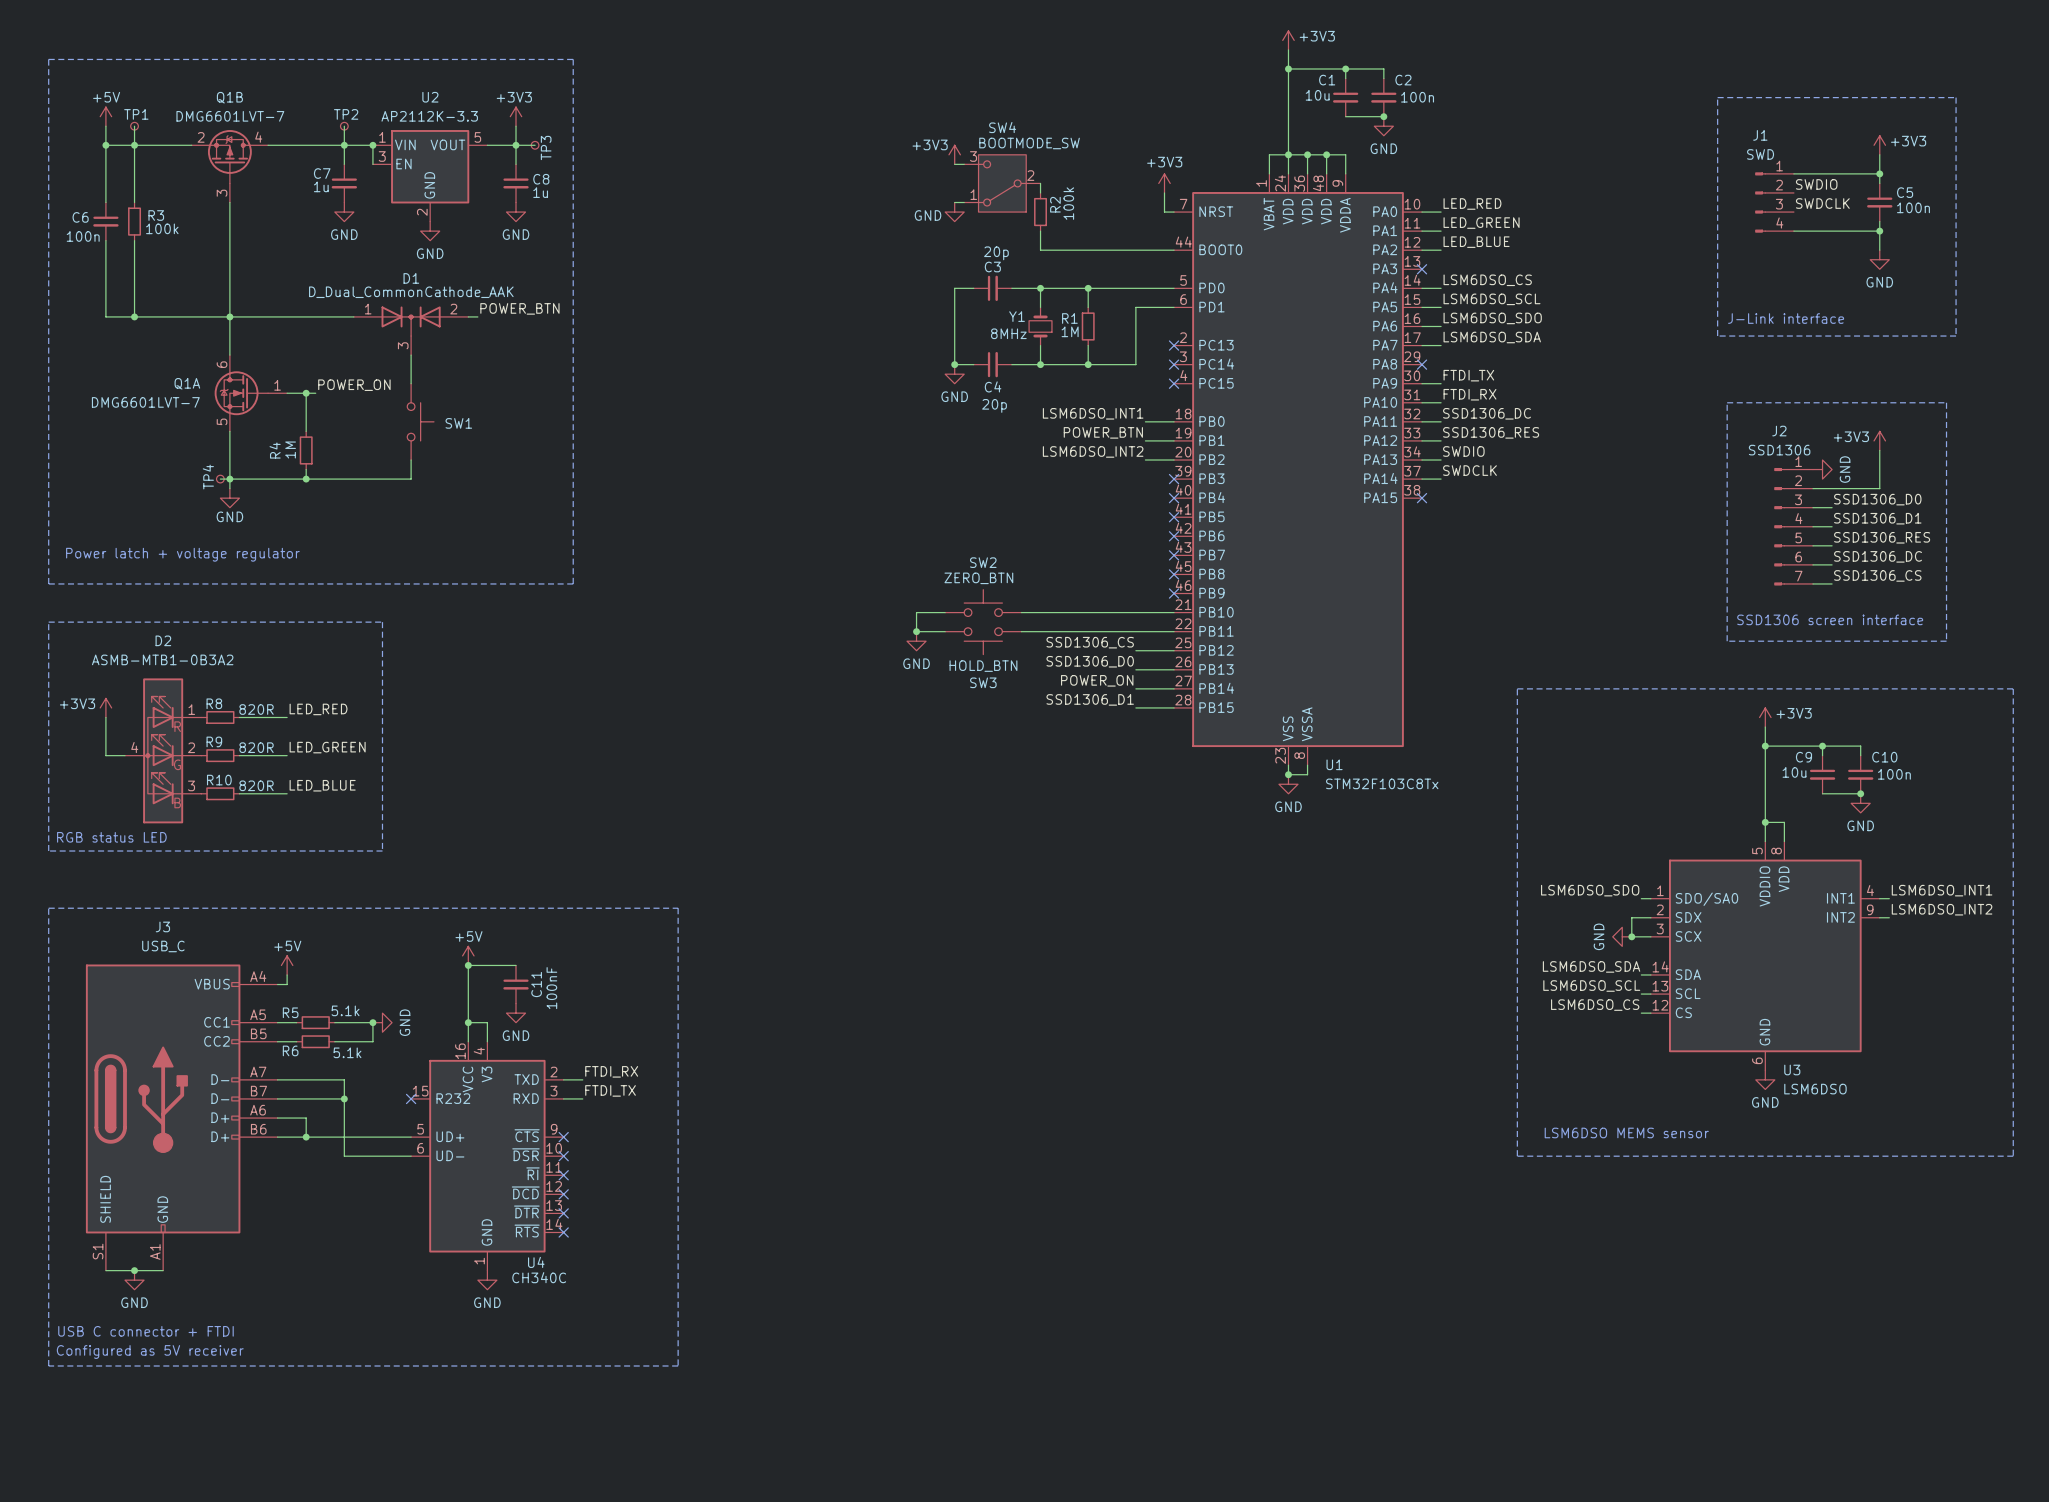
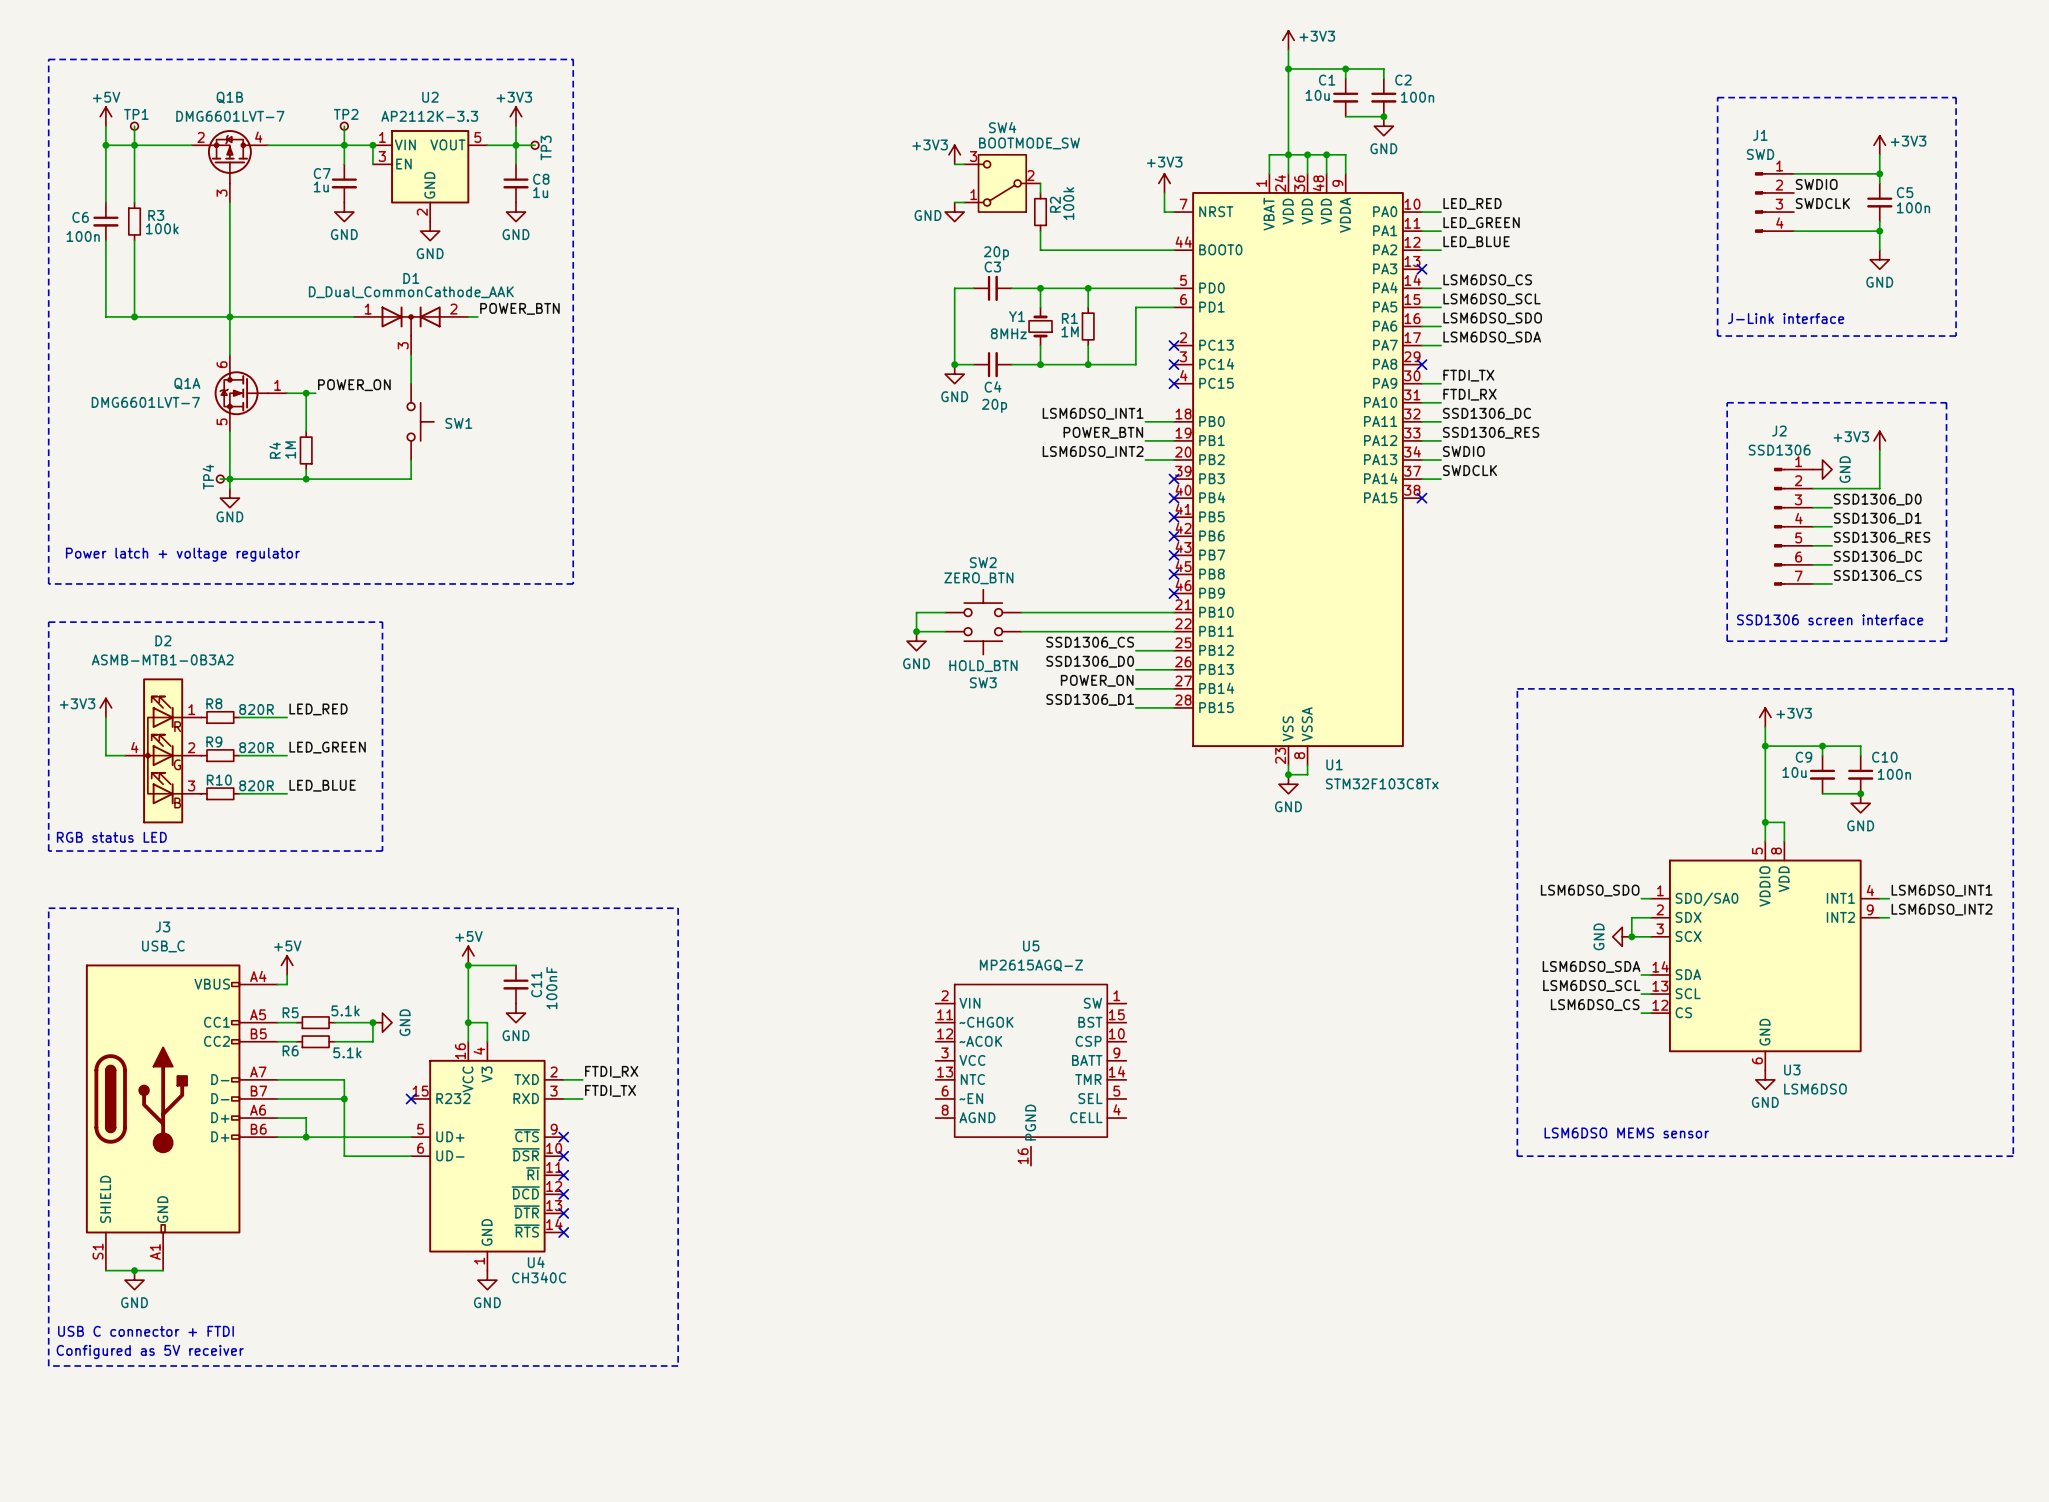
U5: none -> MP2615AGQ-Z (1030, 1075)

